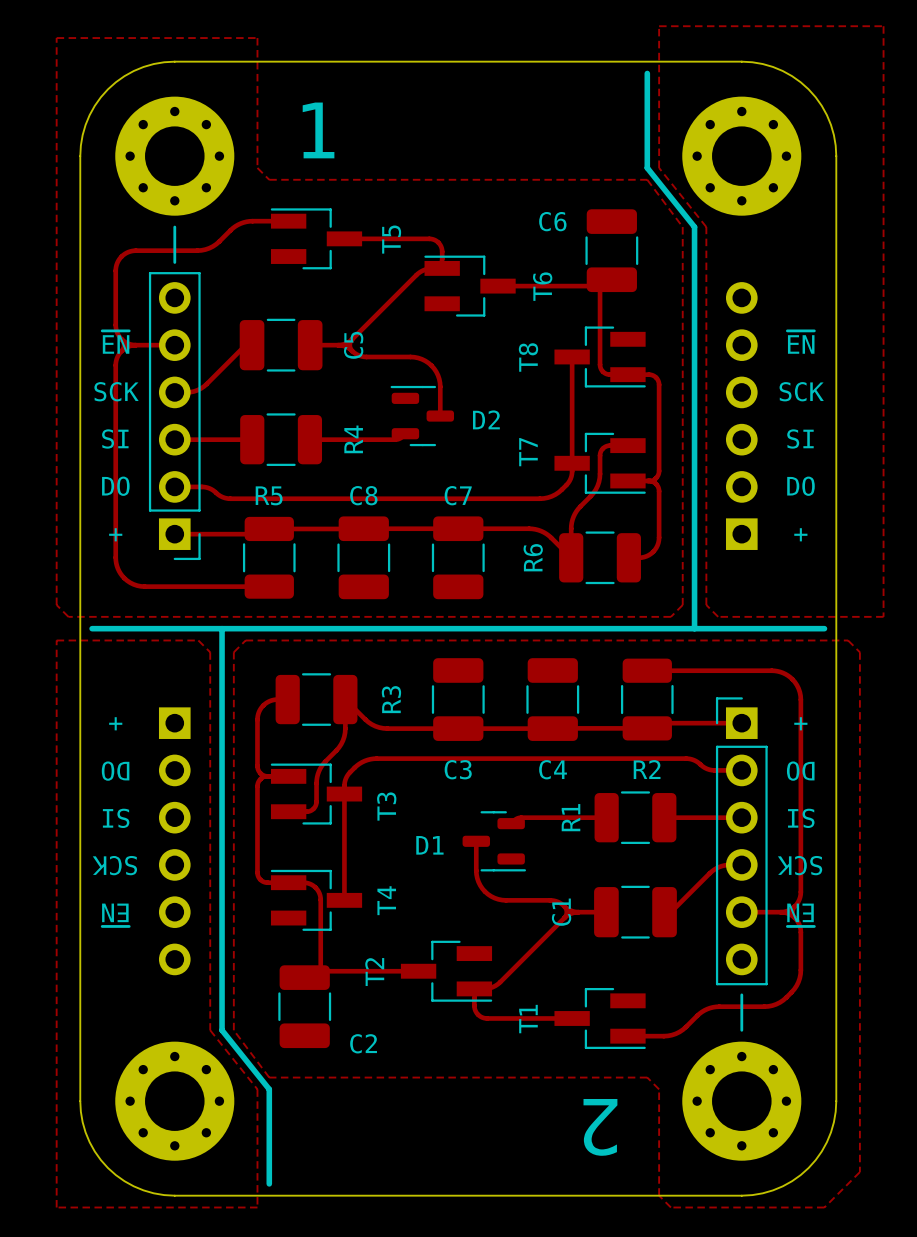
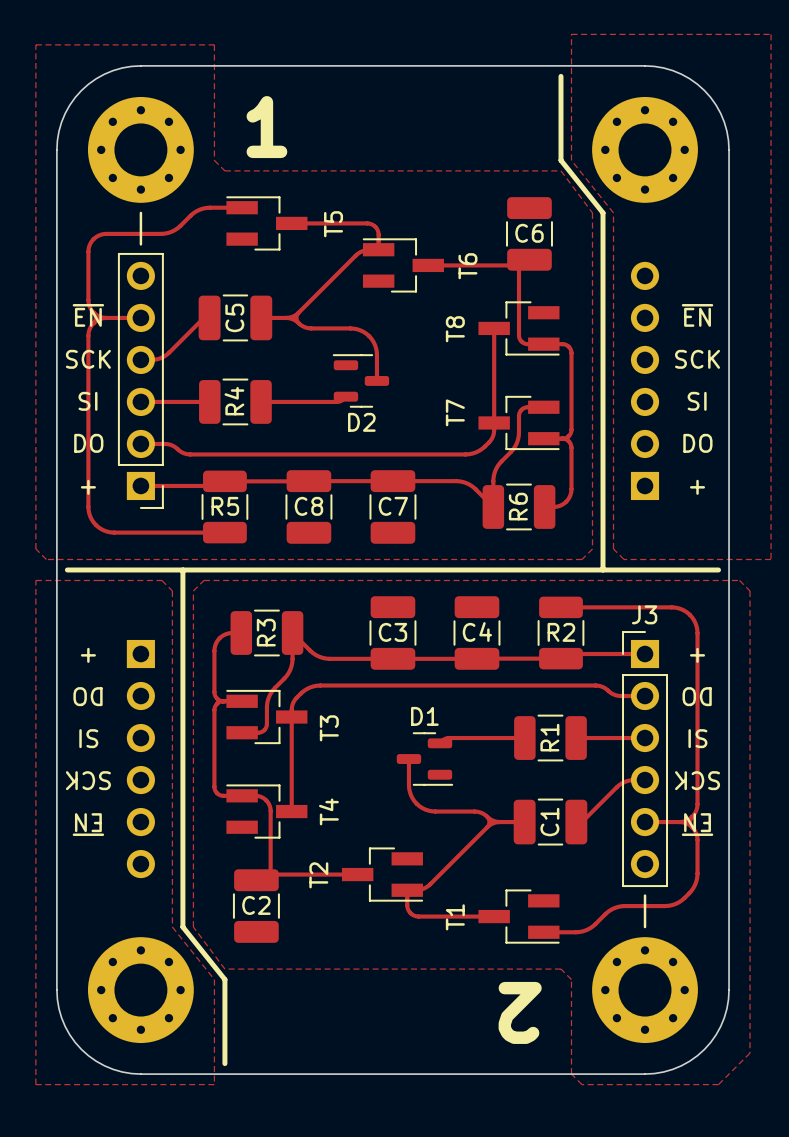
C6 name position: C6 (552, 221) -> C6 (529, 233)
C5 name position: C5 (353, 345) -> C5 (234, 317)
D2 name position: D2 (486, 419) -> D2 (361, 422)
R4 name position: R4 (353, 439) -> R4 (234, 401)
R5 name position: R5 (269, 495) -> R5 (225, 506)
C8 name position: C8 (363, 495) -> C8 (308, 506)
C7 name position: C7 (458, 495) -> C7 (393, 506)
R6 name position: R6 (533, 557) -> R6 (518, 506)
J3 name: none -> J3 (644, 614)
R3 name position: R3 (391, 699) -> R3 (266, 632)
C3 name position: C3 (458, 769) -> C3 (392, 632)
C4 name position: C4 (553, 769) -> C4 (477, 631)
R2 name position: R2 (647, 769) -> R2 (561, 632)
R1 name position: R1 (571, 817) -> R1 (549, 737)
D1 name position: D1 (429, 845) -> D1 (424, 716)
C1 name position: C1 (561, 912) -> C1 (549, 822)
C2 name position: C2 (363, 1043) -> C2 (256, 905)

